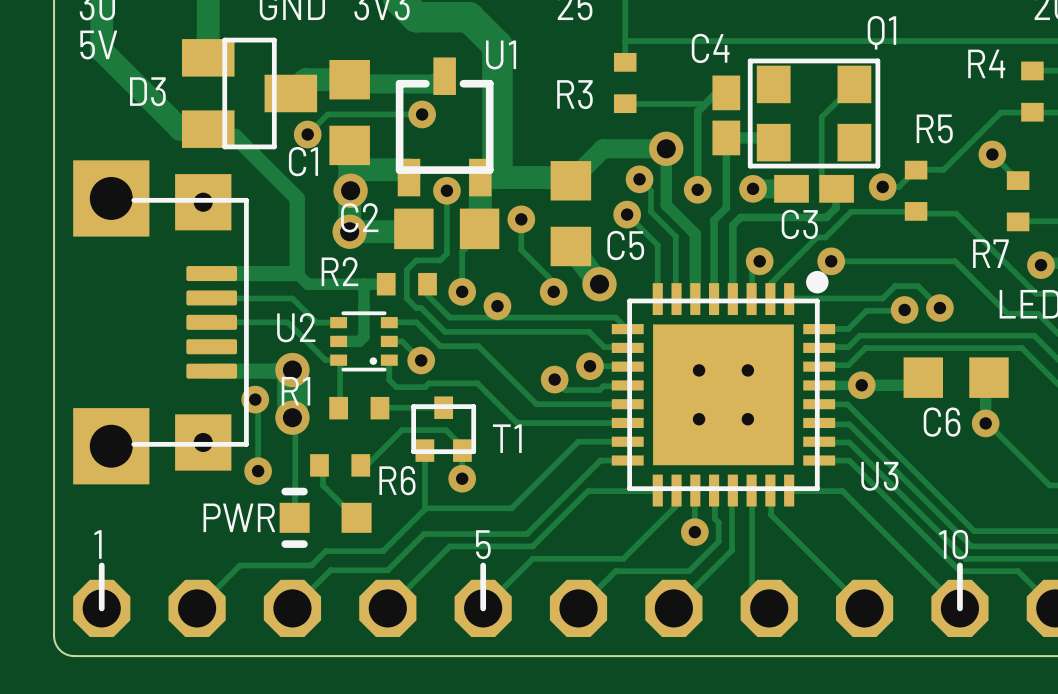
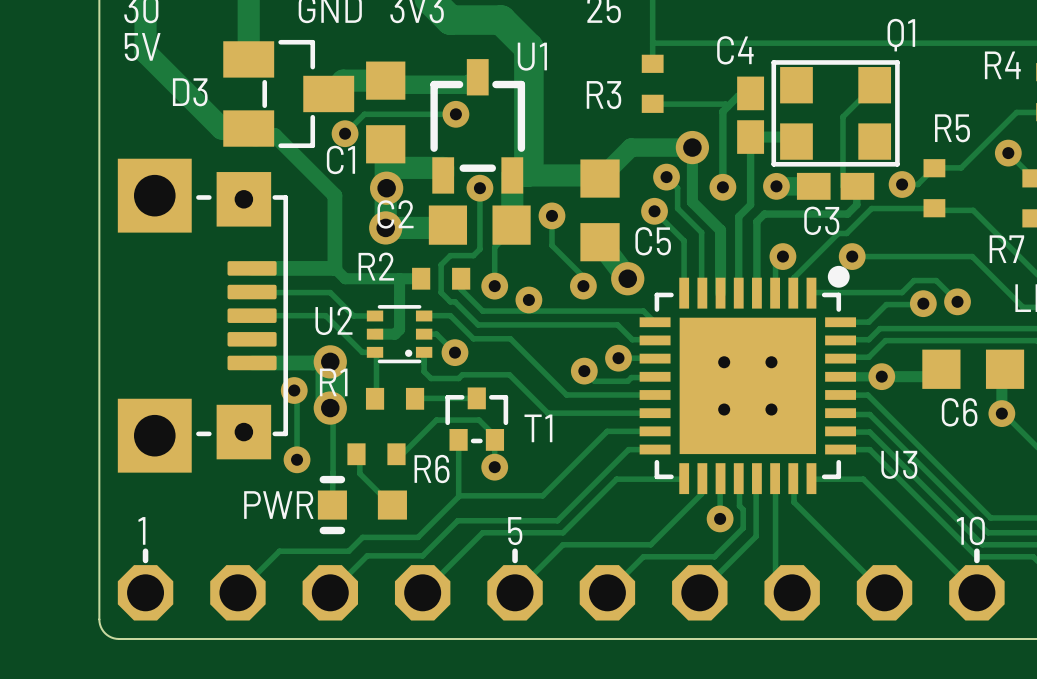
D3 footprint: [181, 37, 318, 150] -> [223, 39, 355, 149]
U1 footprint: [395, 57, 494, 197] -> [430, 59, 526, 194]
part footprint: [73, 160, 249, 485] -> [117, 158, 289, 473]
U3 footprint: [611, 270, 836, 507] -> [639, 265, 857, 495]
T1 footprint: [411, 396, 477, 462] -> [445, 387, 509, 451]
line: (101, 575) (101, 608) -> none
line: (483, 575) (483, 608) -> none
line: (959, 575) (959, 608) -> none

